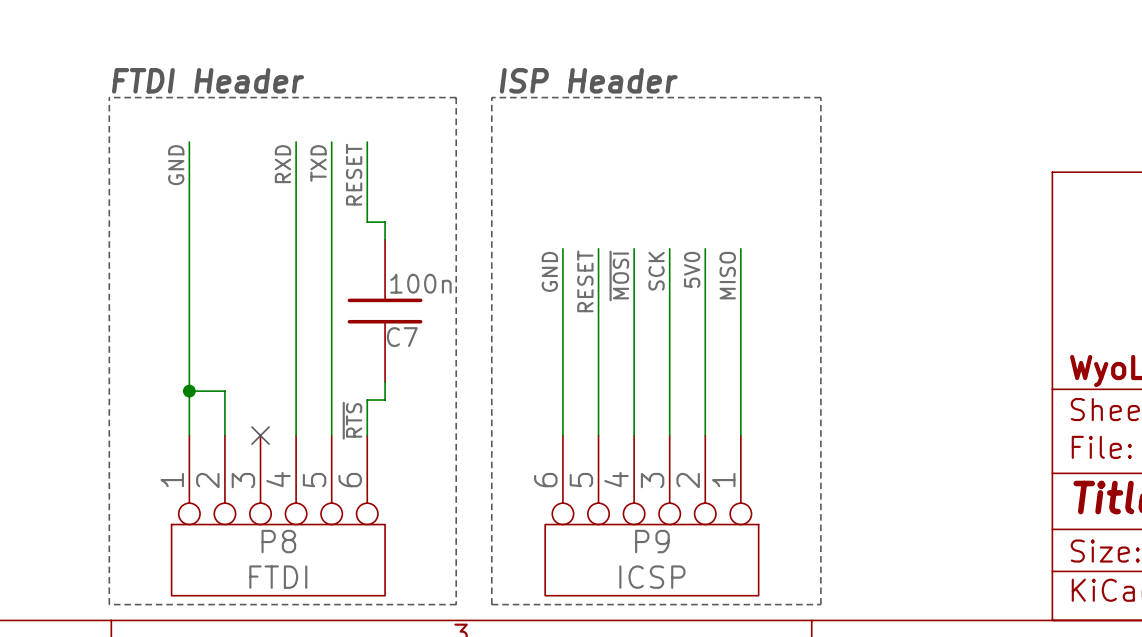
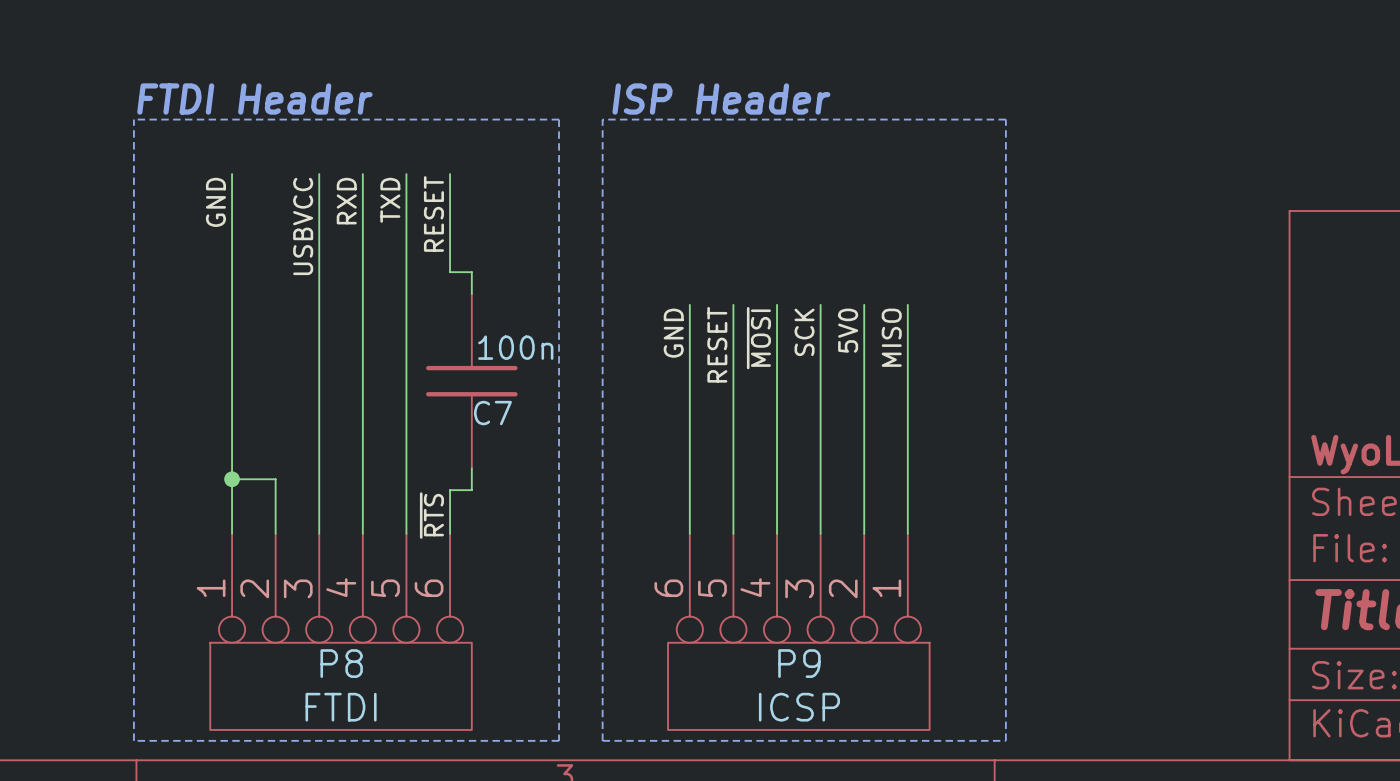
wire: none -> (319, 174) (319, 533)
label: none -> USBVCC (303, 226)
no-connect mark: (260, 435) -> none

